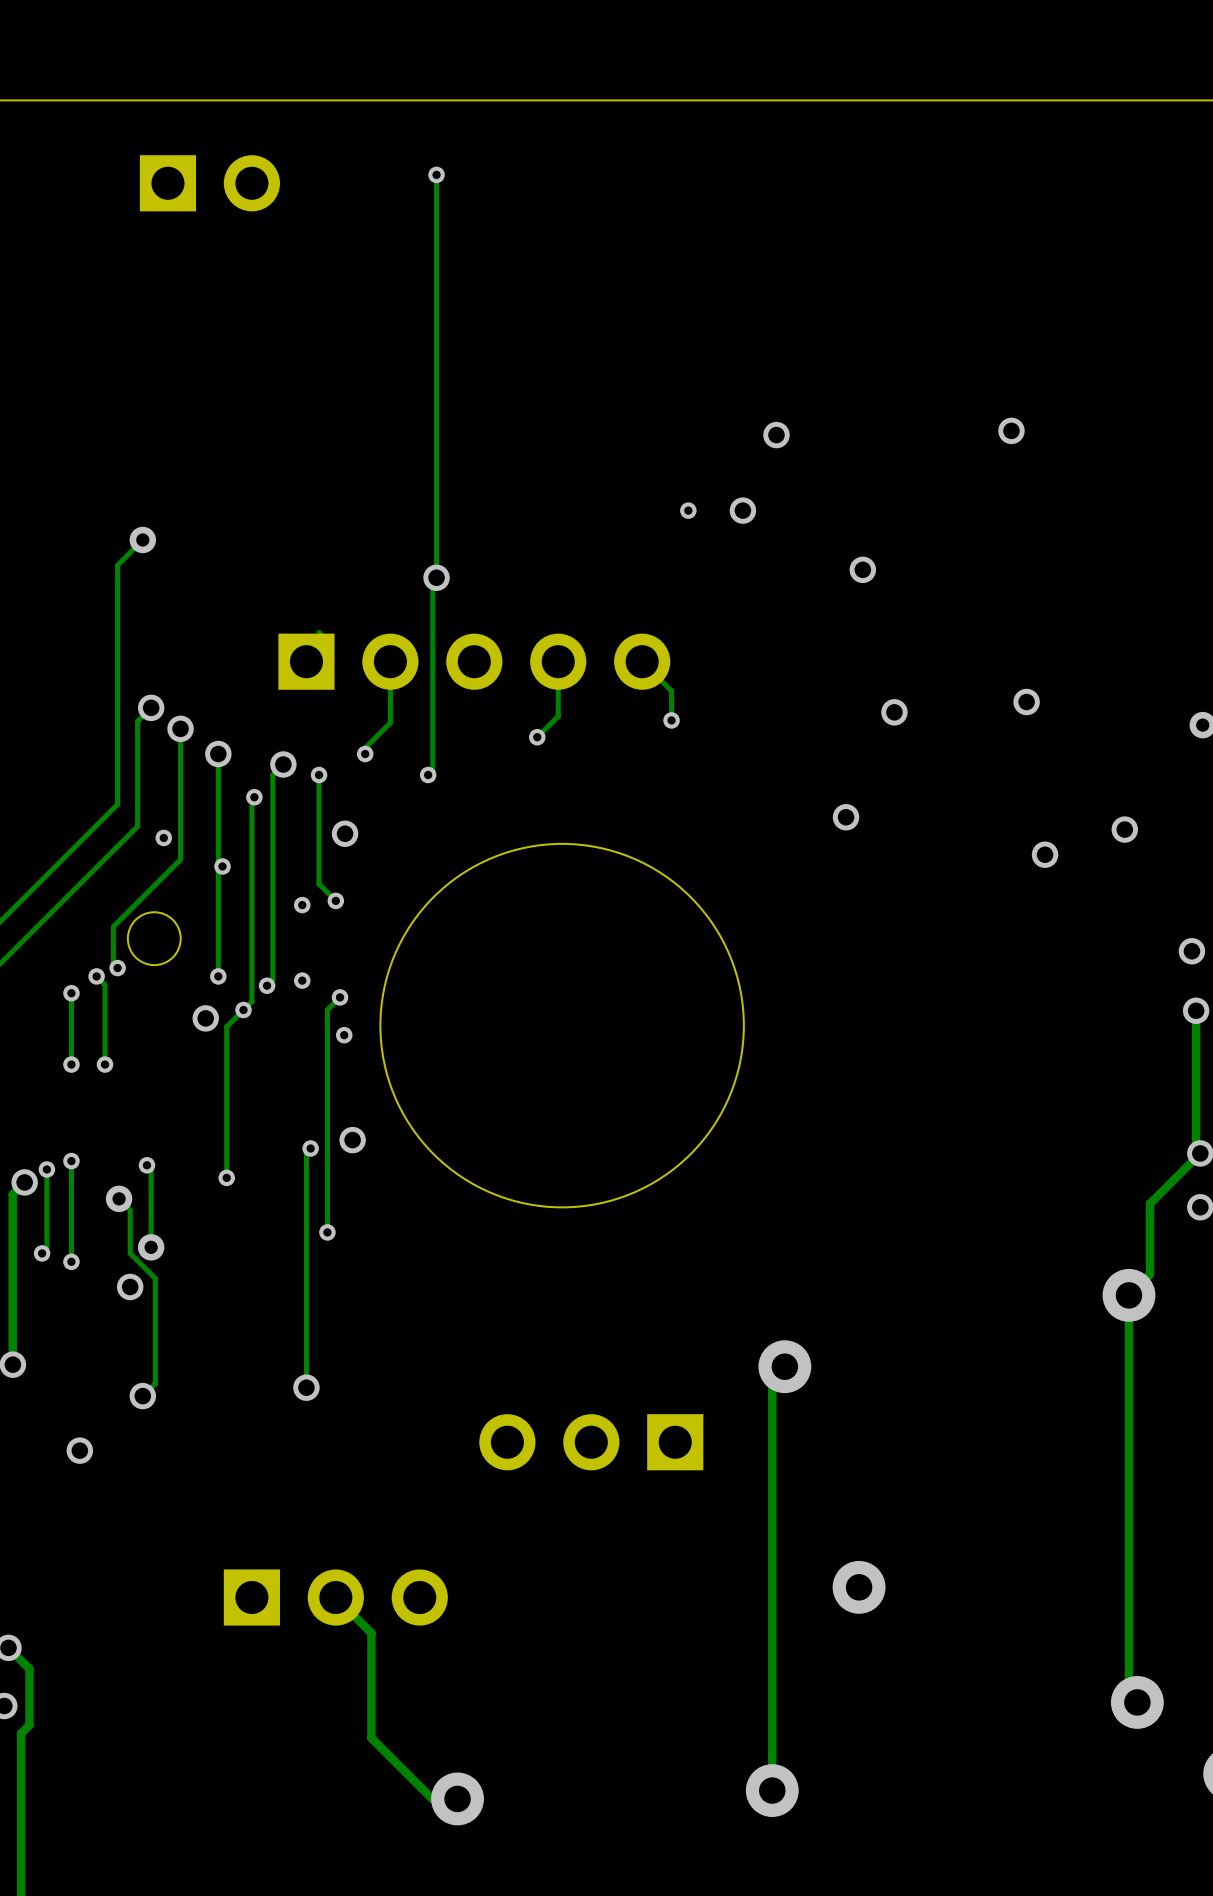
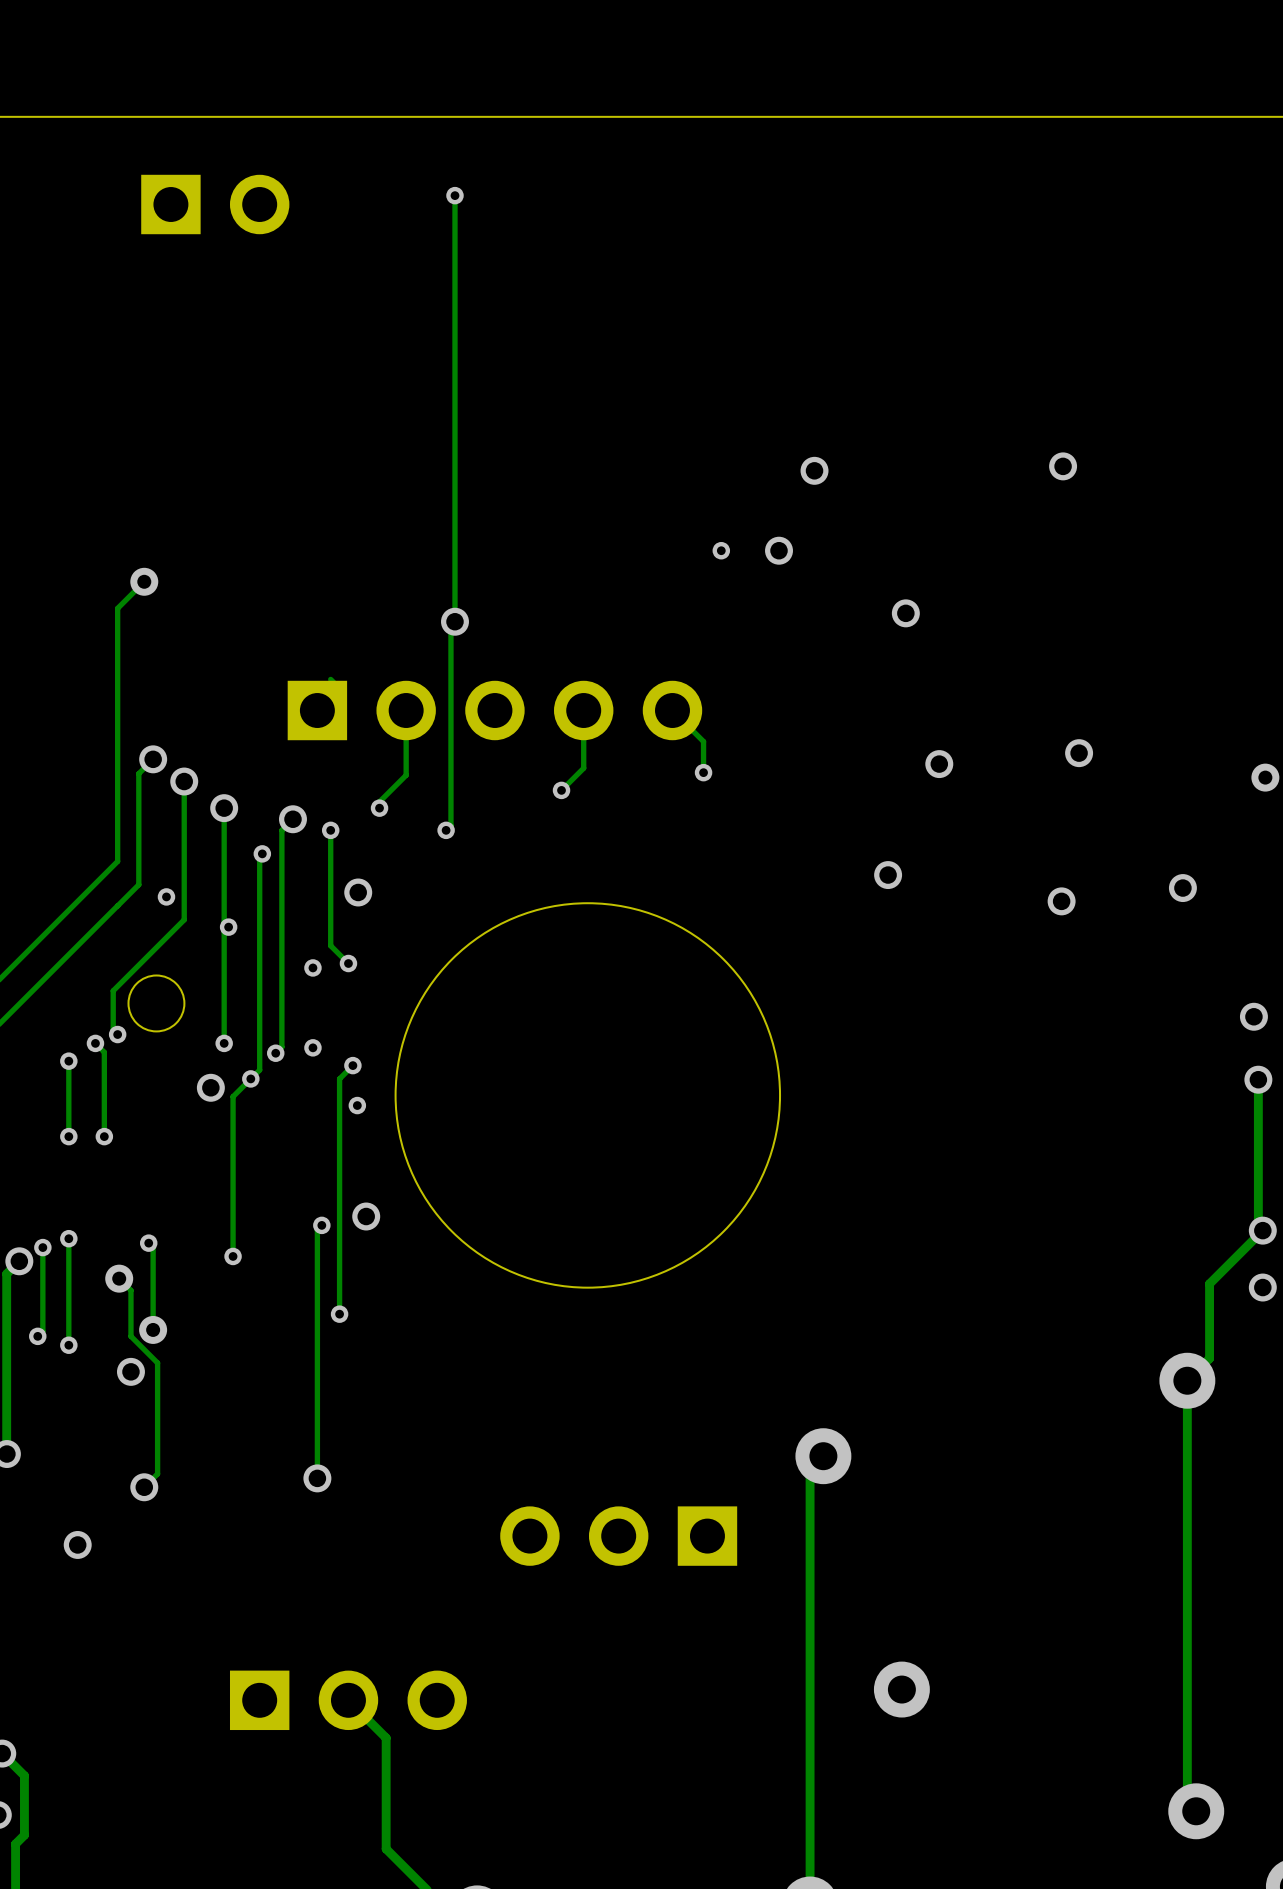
via position: (1045, 854) -> (1061, 901)

